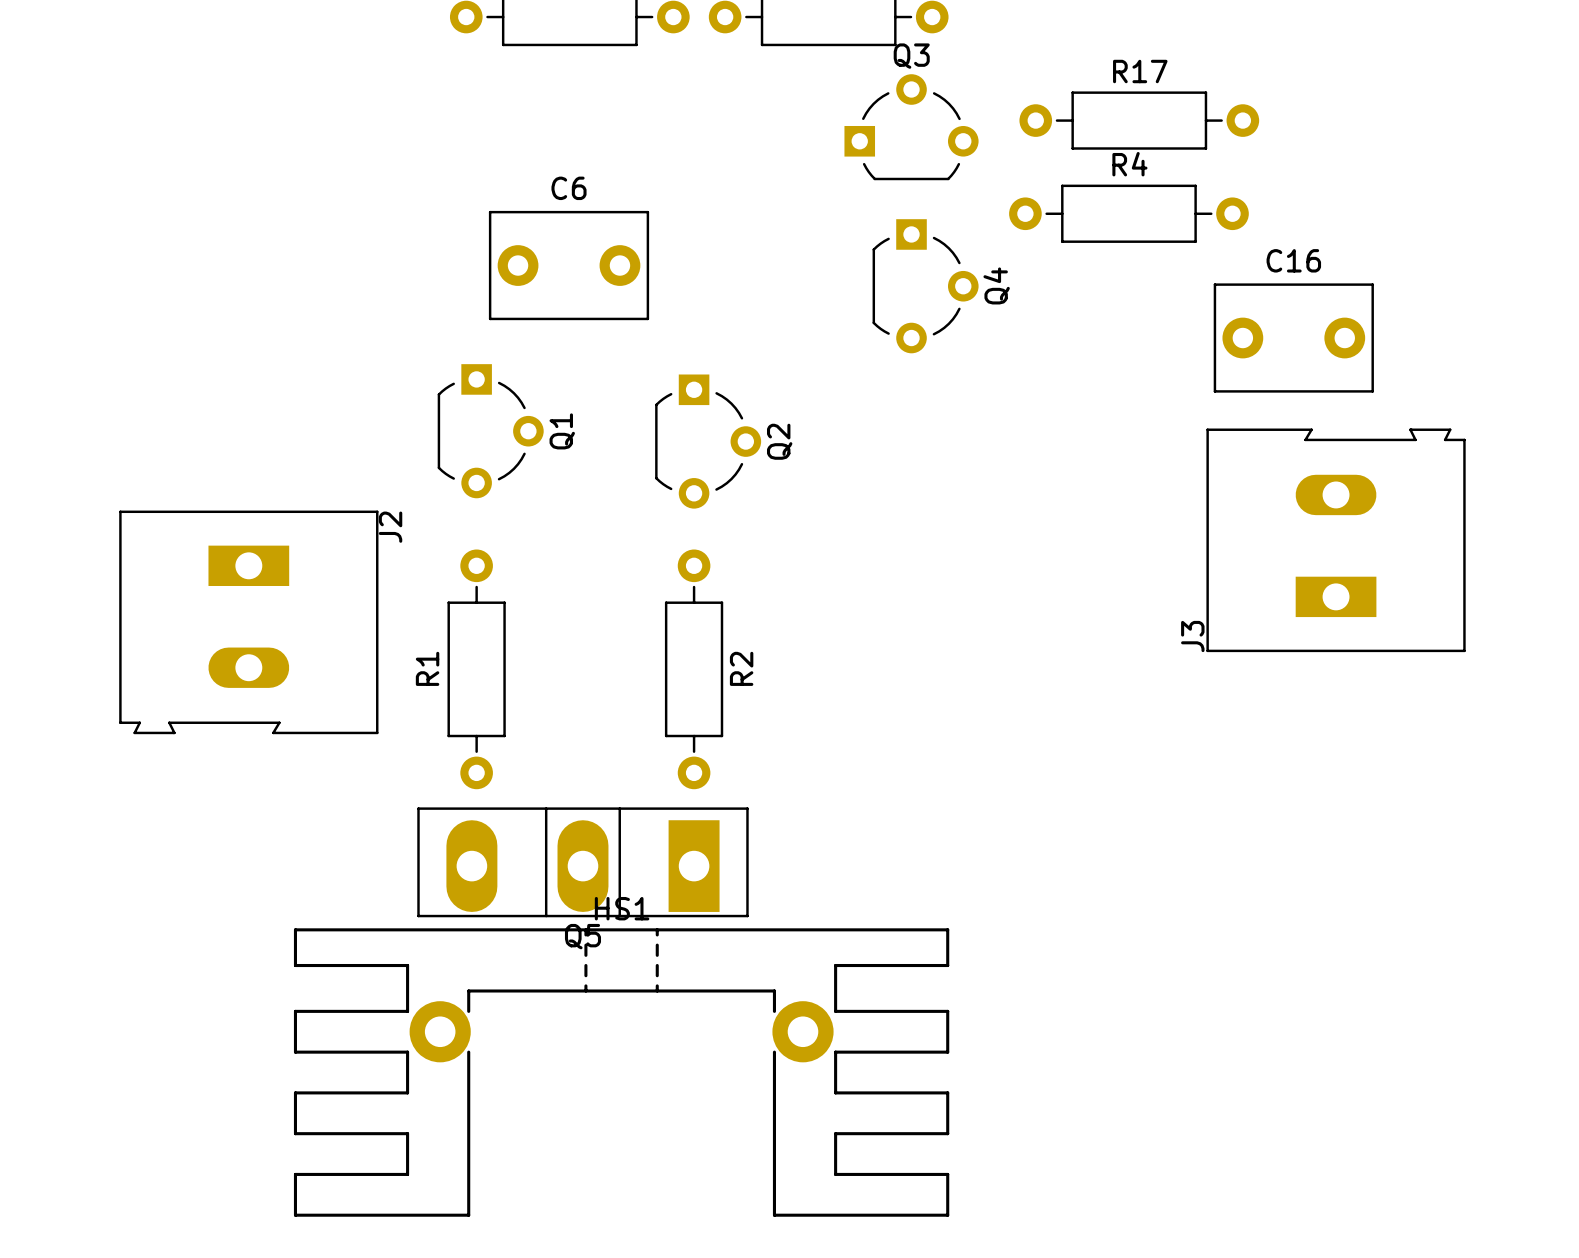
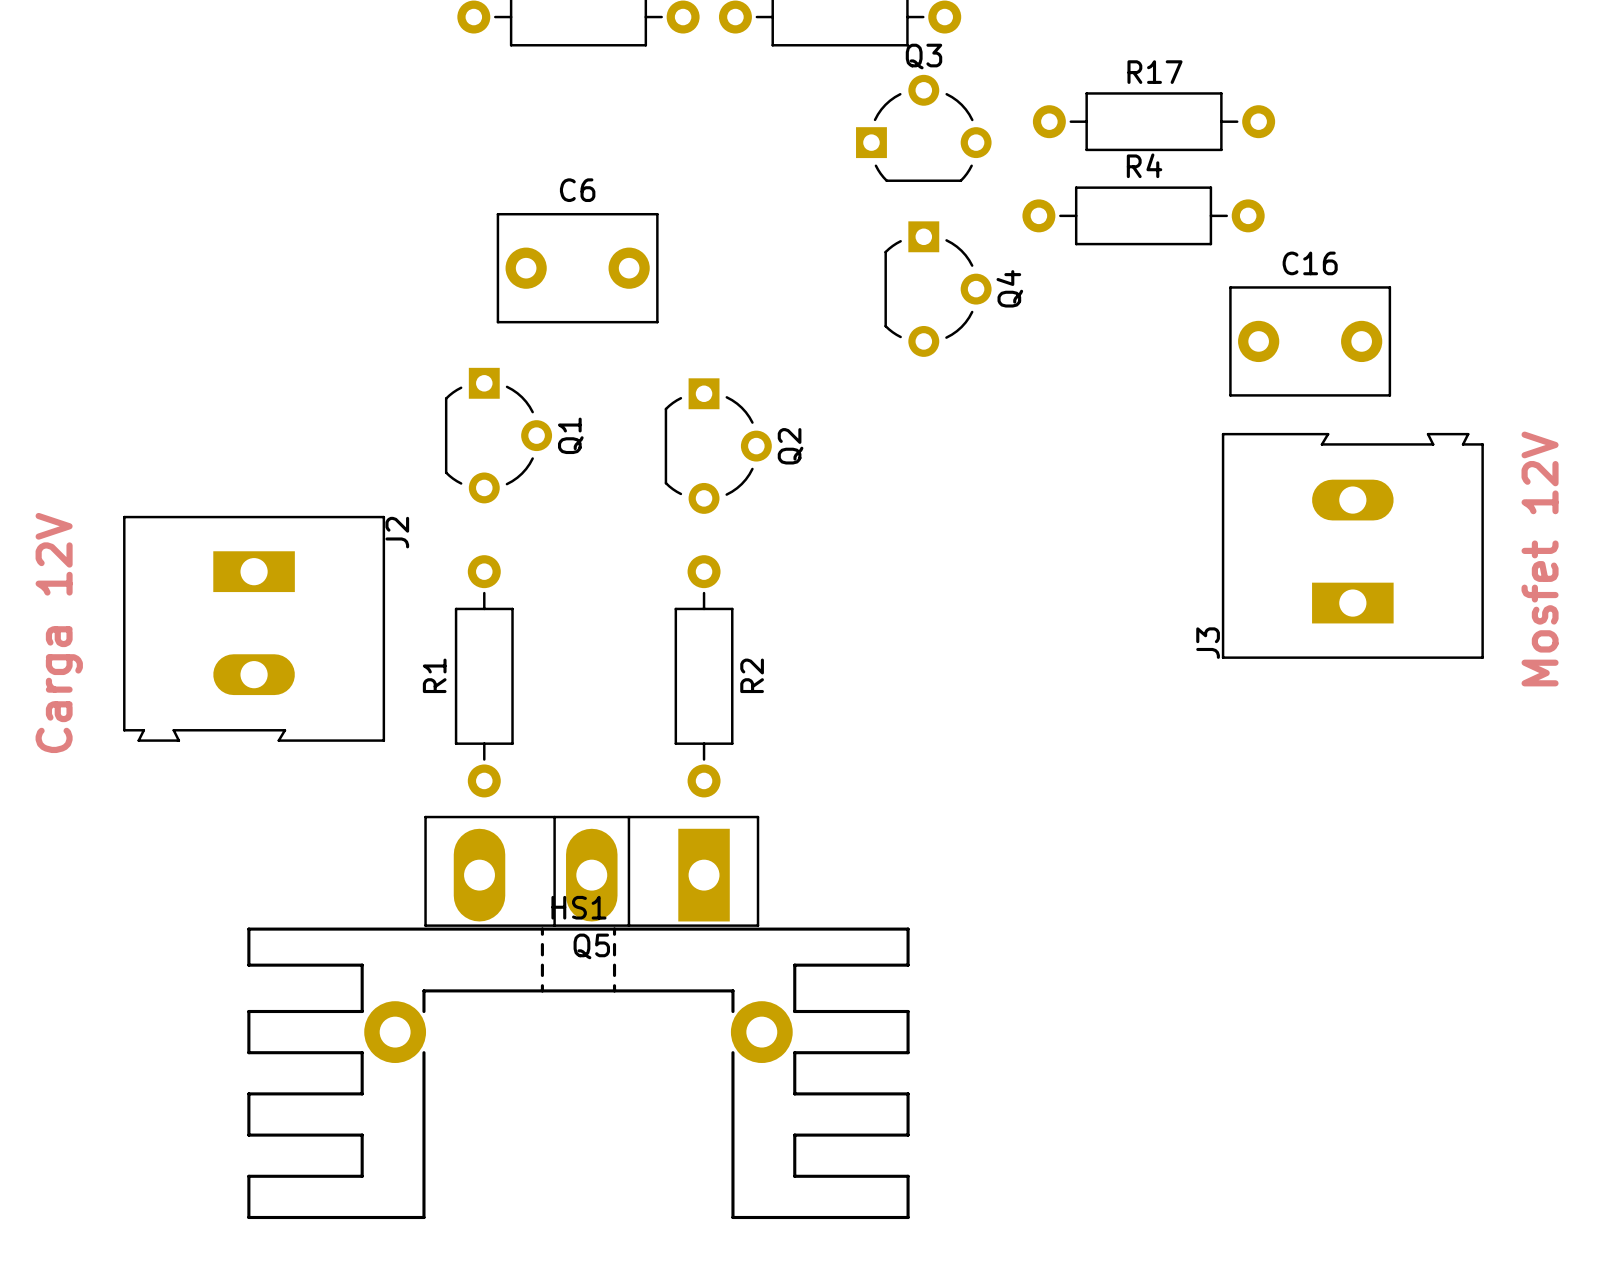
text: none -> Mosfet 12V (1540, 558)
text: none -> Carga 12V (59, 632)
HS1 position: (621, 1072) -> (578, 1073)

